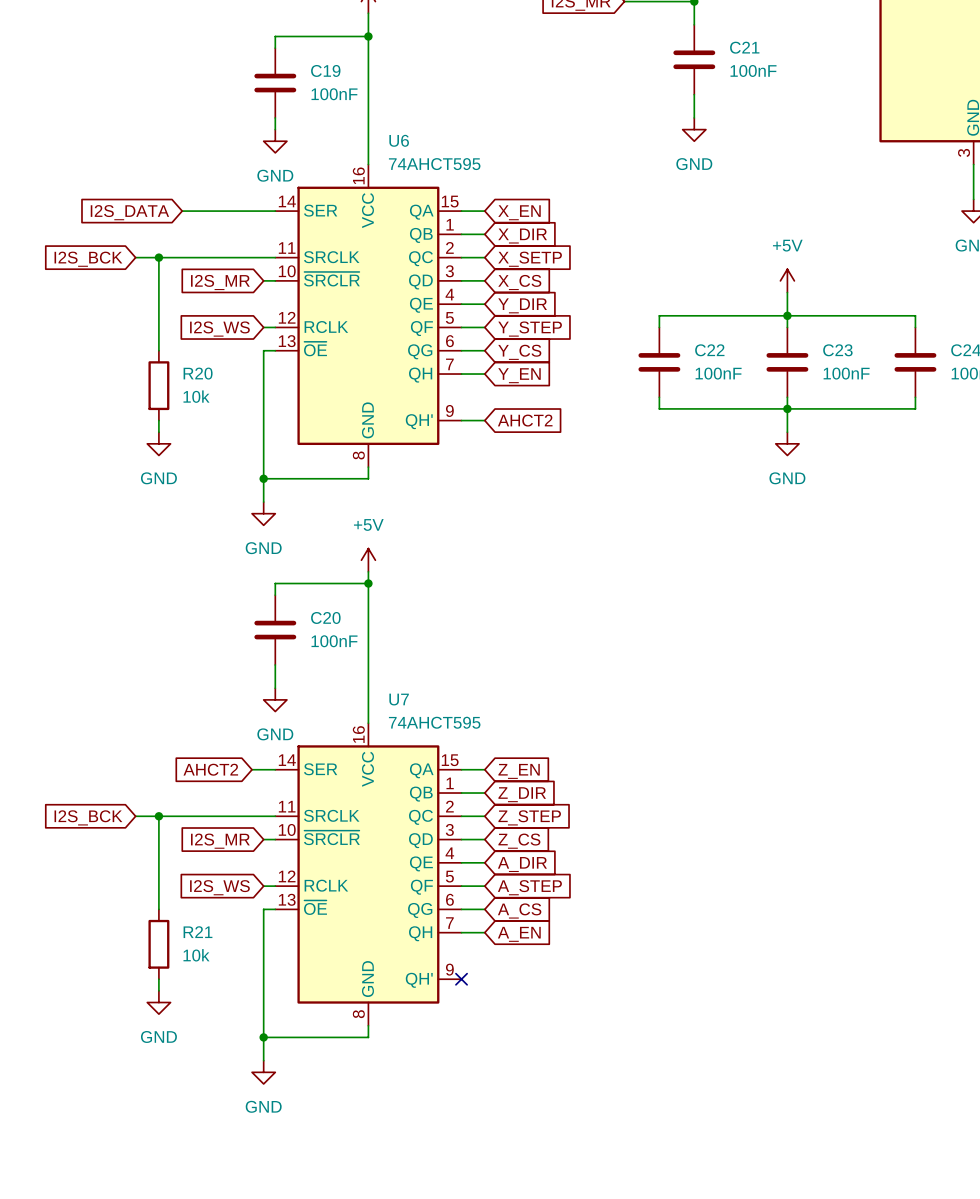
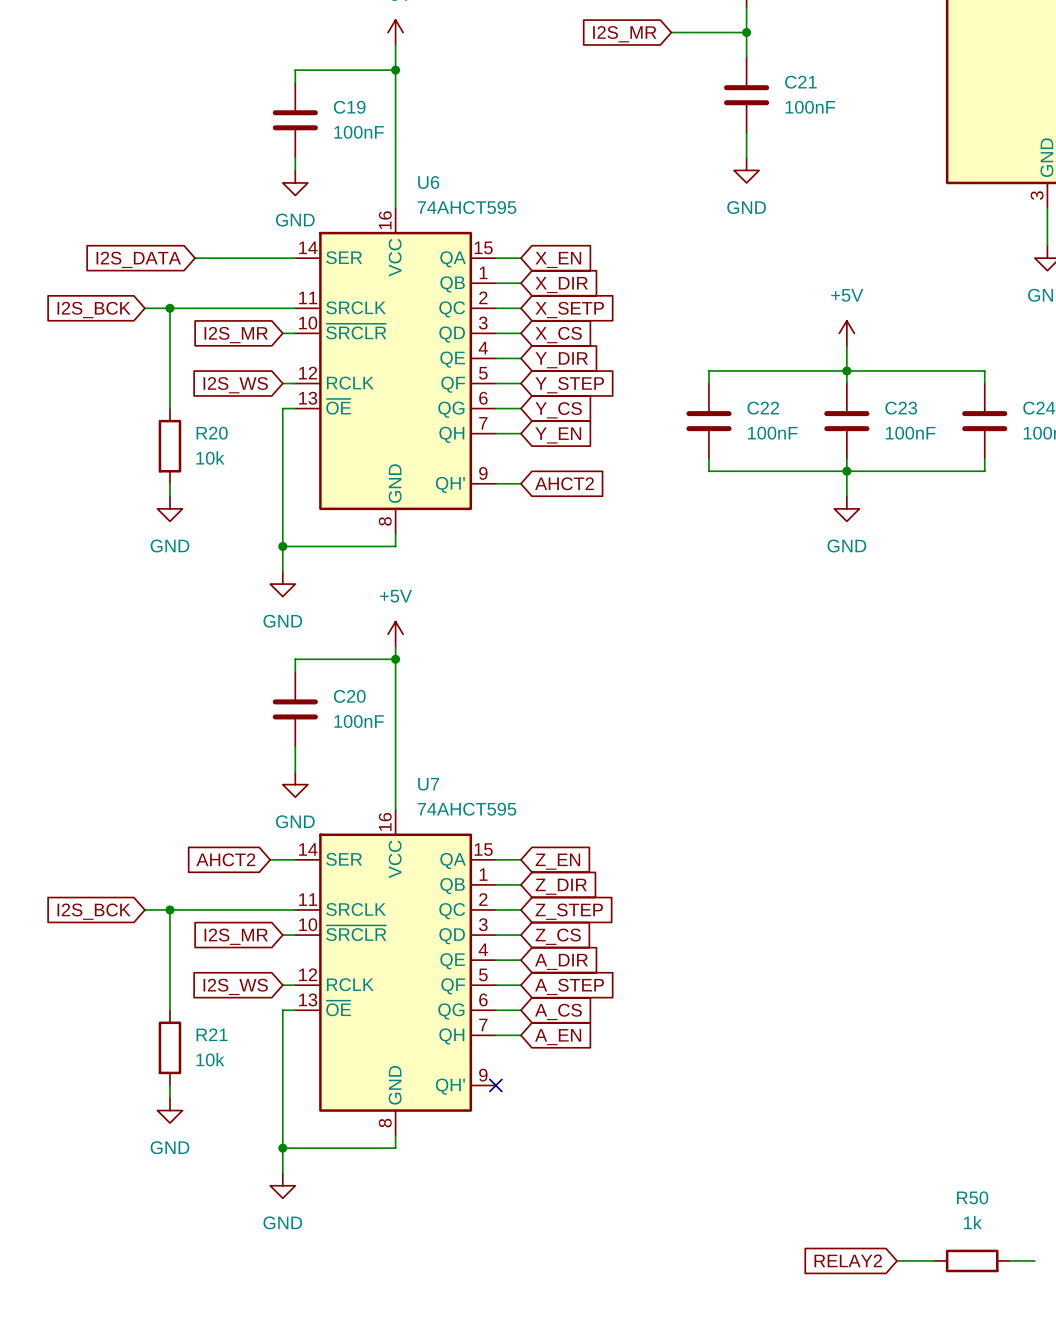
global label: none -> RELAY2 (848, 1260)
wire: none -> (897, 1260) (934, 1260)
R50: none -> 1k (972, 1260)
wire: none -> (1009, 1260) (1034, 1260)

